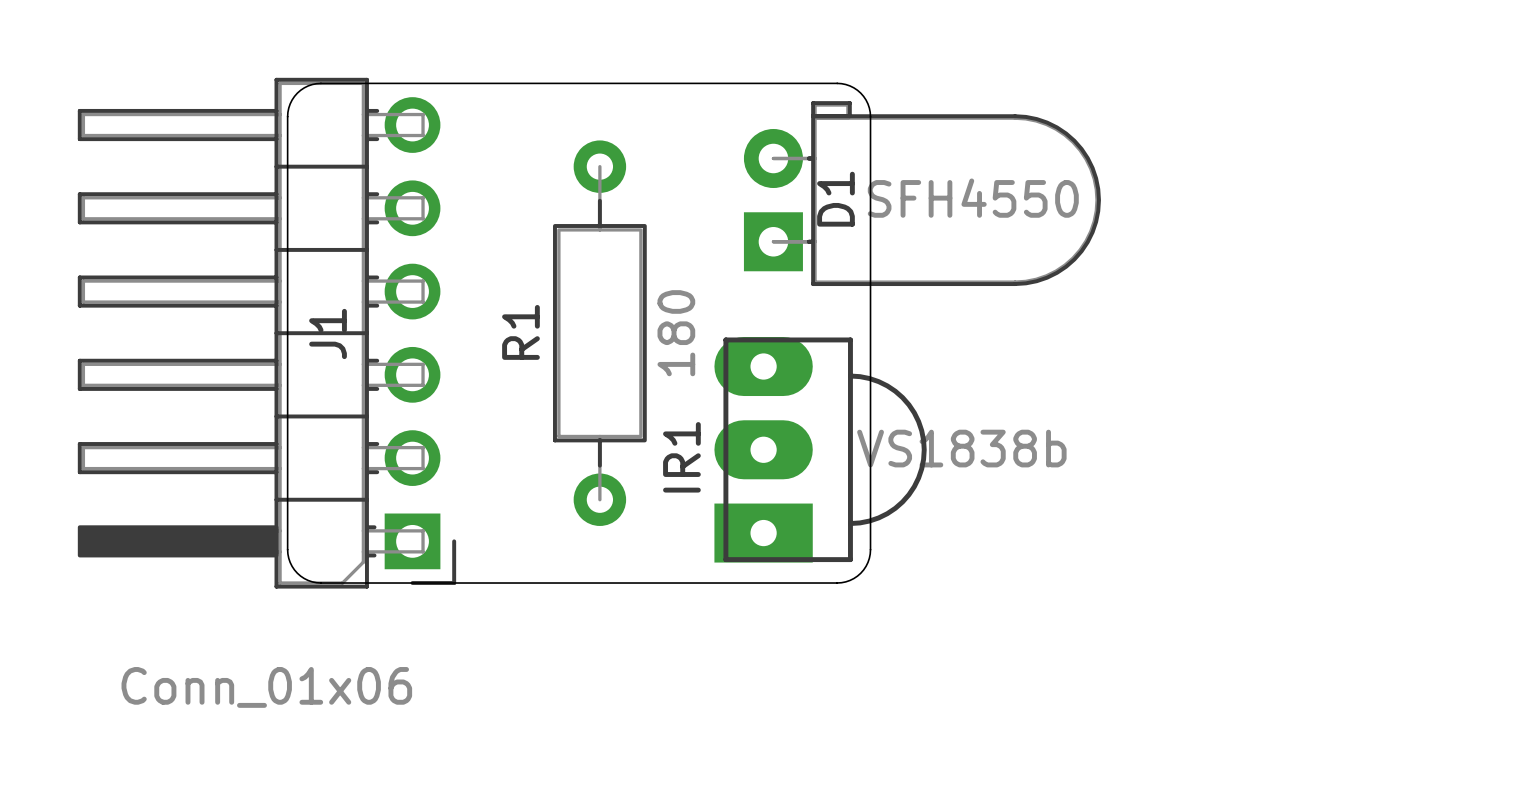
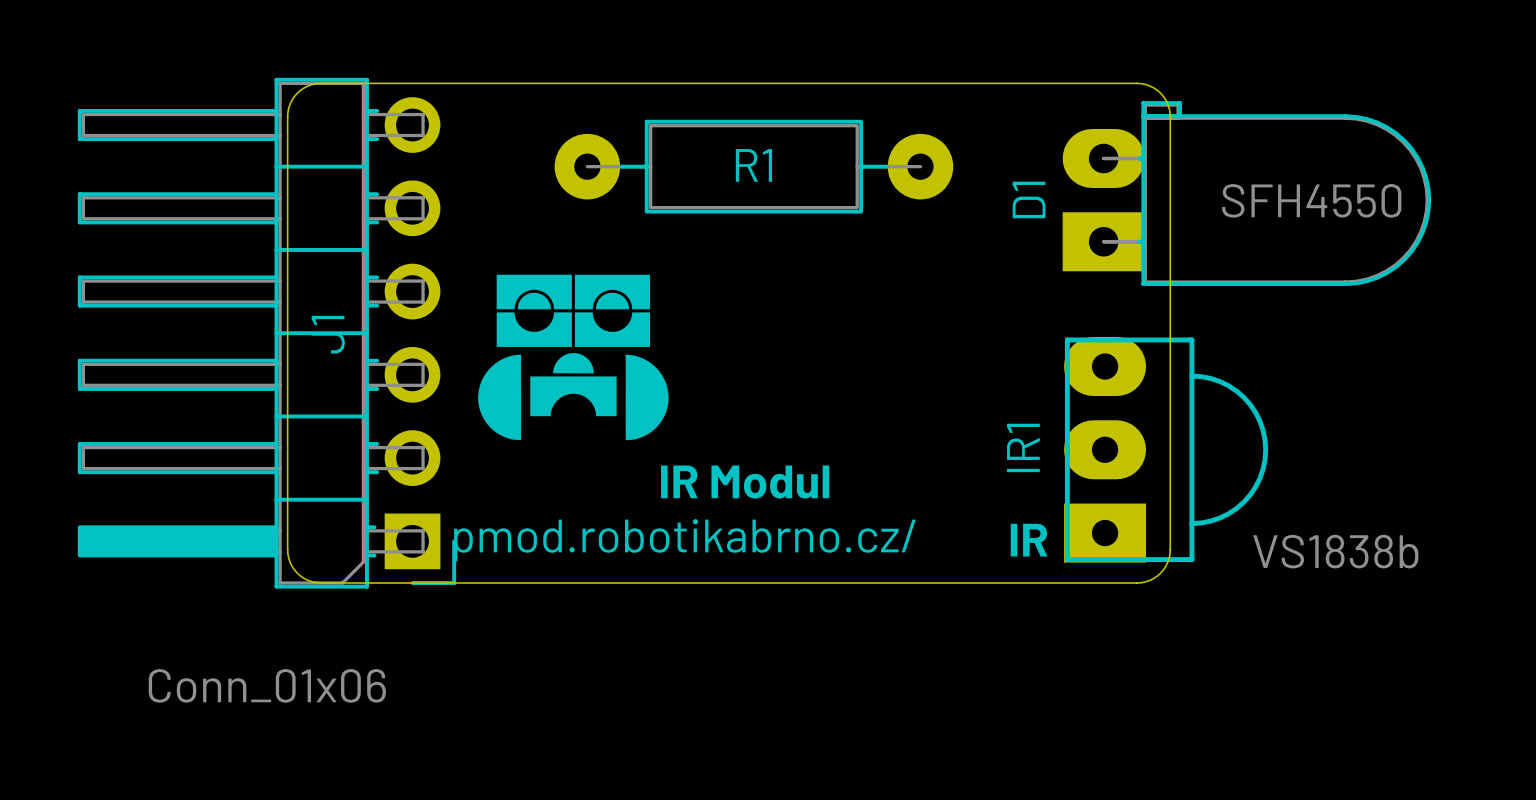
board edge: (837, 83) (849, 85) (860, 93) (867, 103) (870, 116) (870, 554) (866, 566) (857, 576) (845, 581) (837, 583) -> (837, 83) (1141, 83) (1153, 87) (1163, 96) (1169, 108) (1170, 116) (1170, 549) (1169, 558) (1163, 569) (1153, 578) (1136, 583) (837, 583)
D1 footprint: [743, 101, 1101, 287] -> [1062, 101, 1432, 287]
R1 footprint: [553, 140, 647, 526] -> [554, 119, 954, 214]
D1 name position: D1 (835, 199) -> D1 (1029, 199)
drawing: none -> [478, 274, 669, 441]
R1 name position: R1 (520, 332) -> R1 (753, 165)
R1 value: 180 (676, 333) -> none
IR1 footprint: [714, 337, 927, 563] -> [1064, 337, 1269, 563]
IR1 value position: VS1838b (961, 448) -> VS1838b (1335, 551)
text: none -> IR Modul (745, 482)
text: none -> pmod.robotikabrno.cz/ (684, 540)
text: none -> IR (1029, 540)

